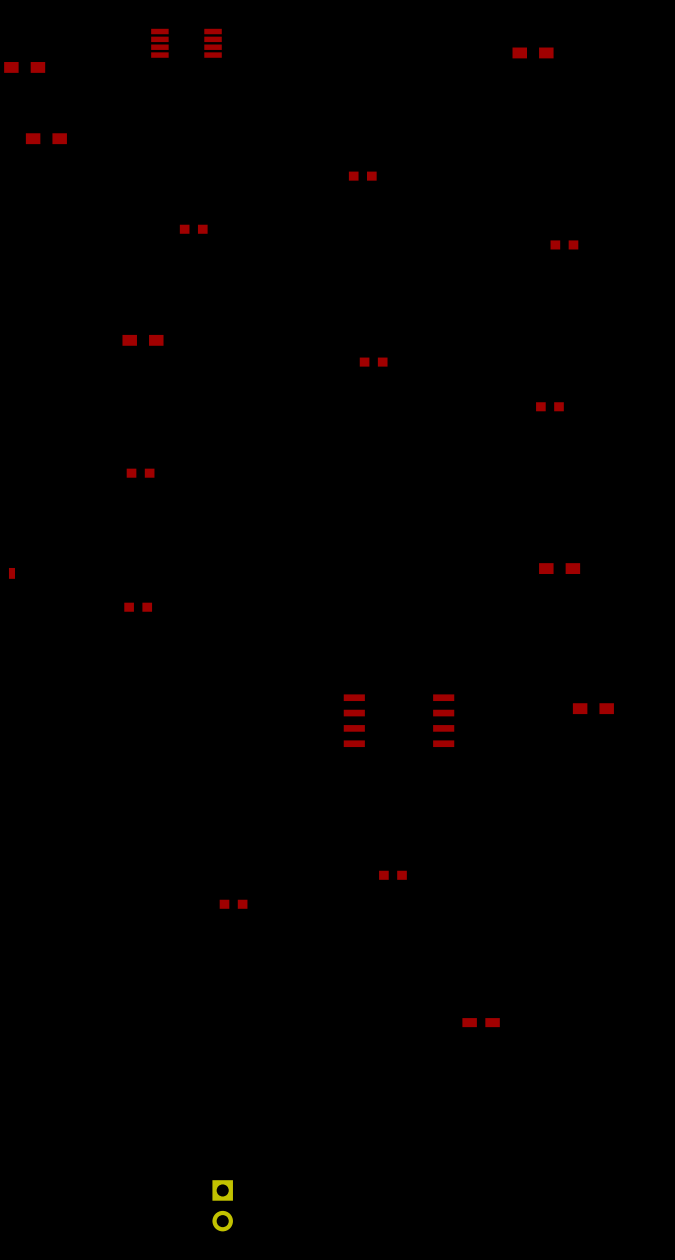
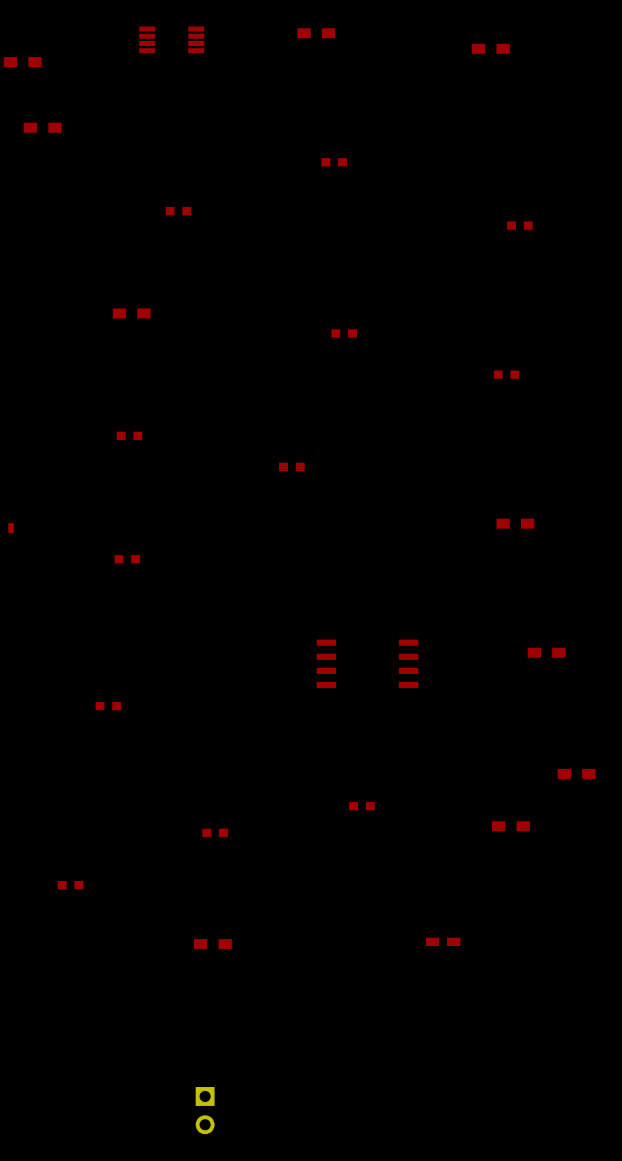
part: none -> (316, 33)
part: none -> (291, 466)
part: none -> (108, 706)
part: none -> (576, 773)
part: none -> (510, 826)
part: none -> (70, 885)
part: none -> (212, 944)

